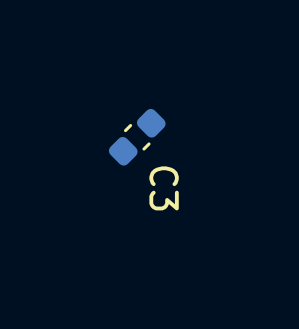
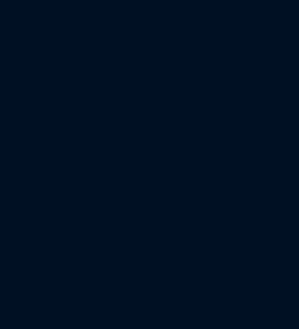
C3: (137, 137) -> none

